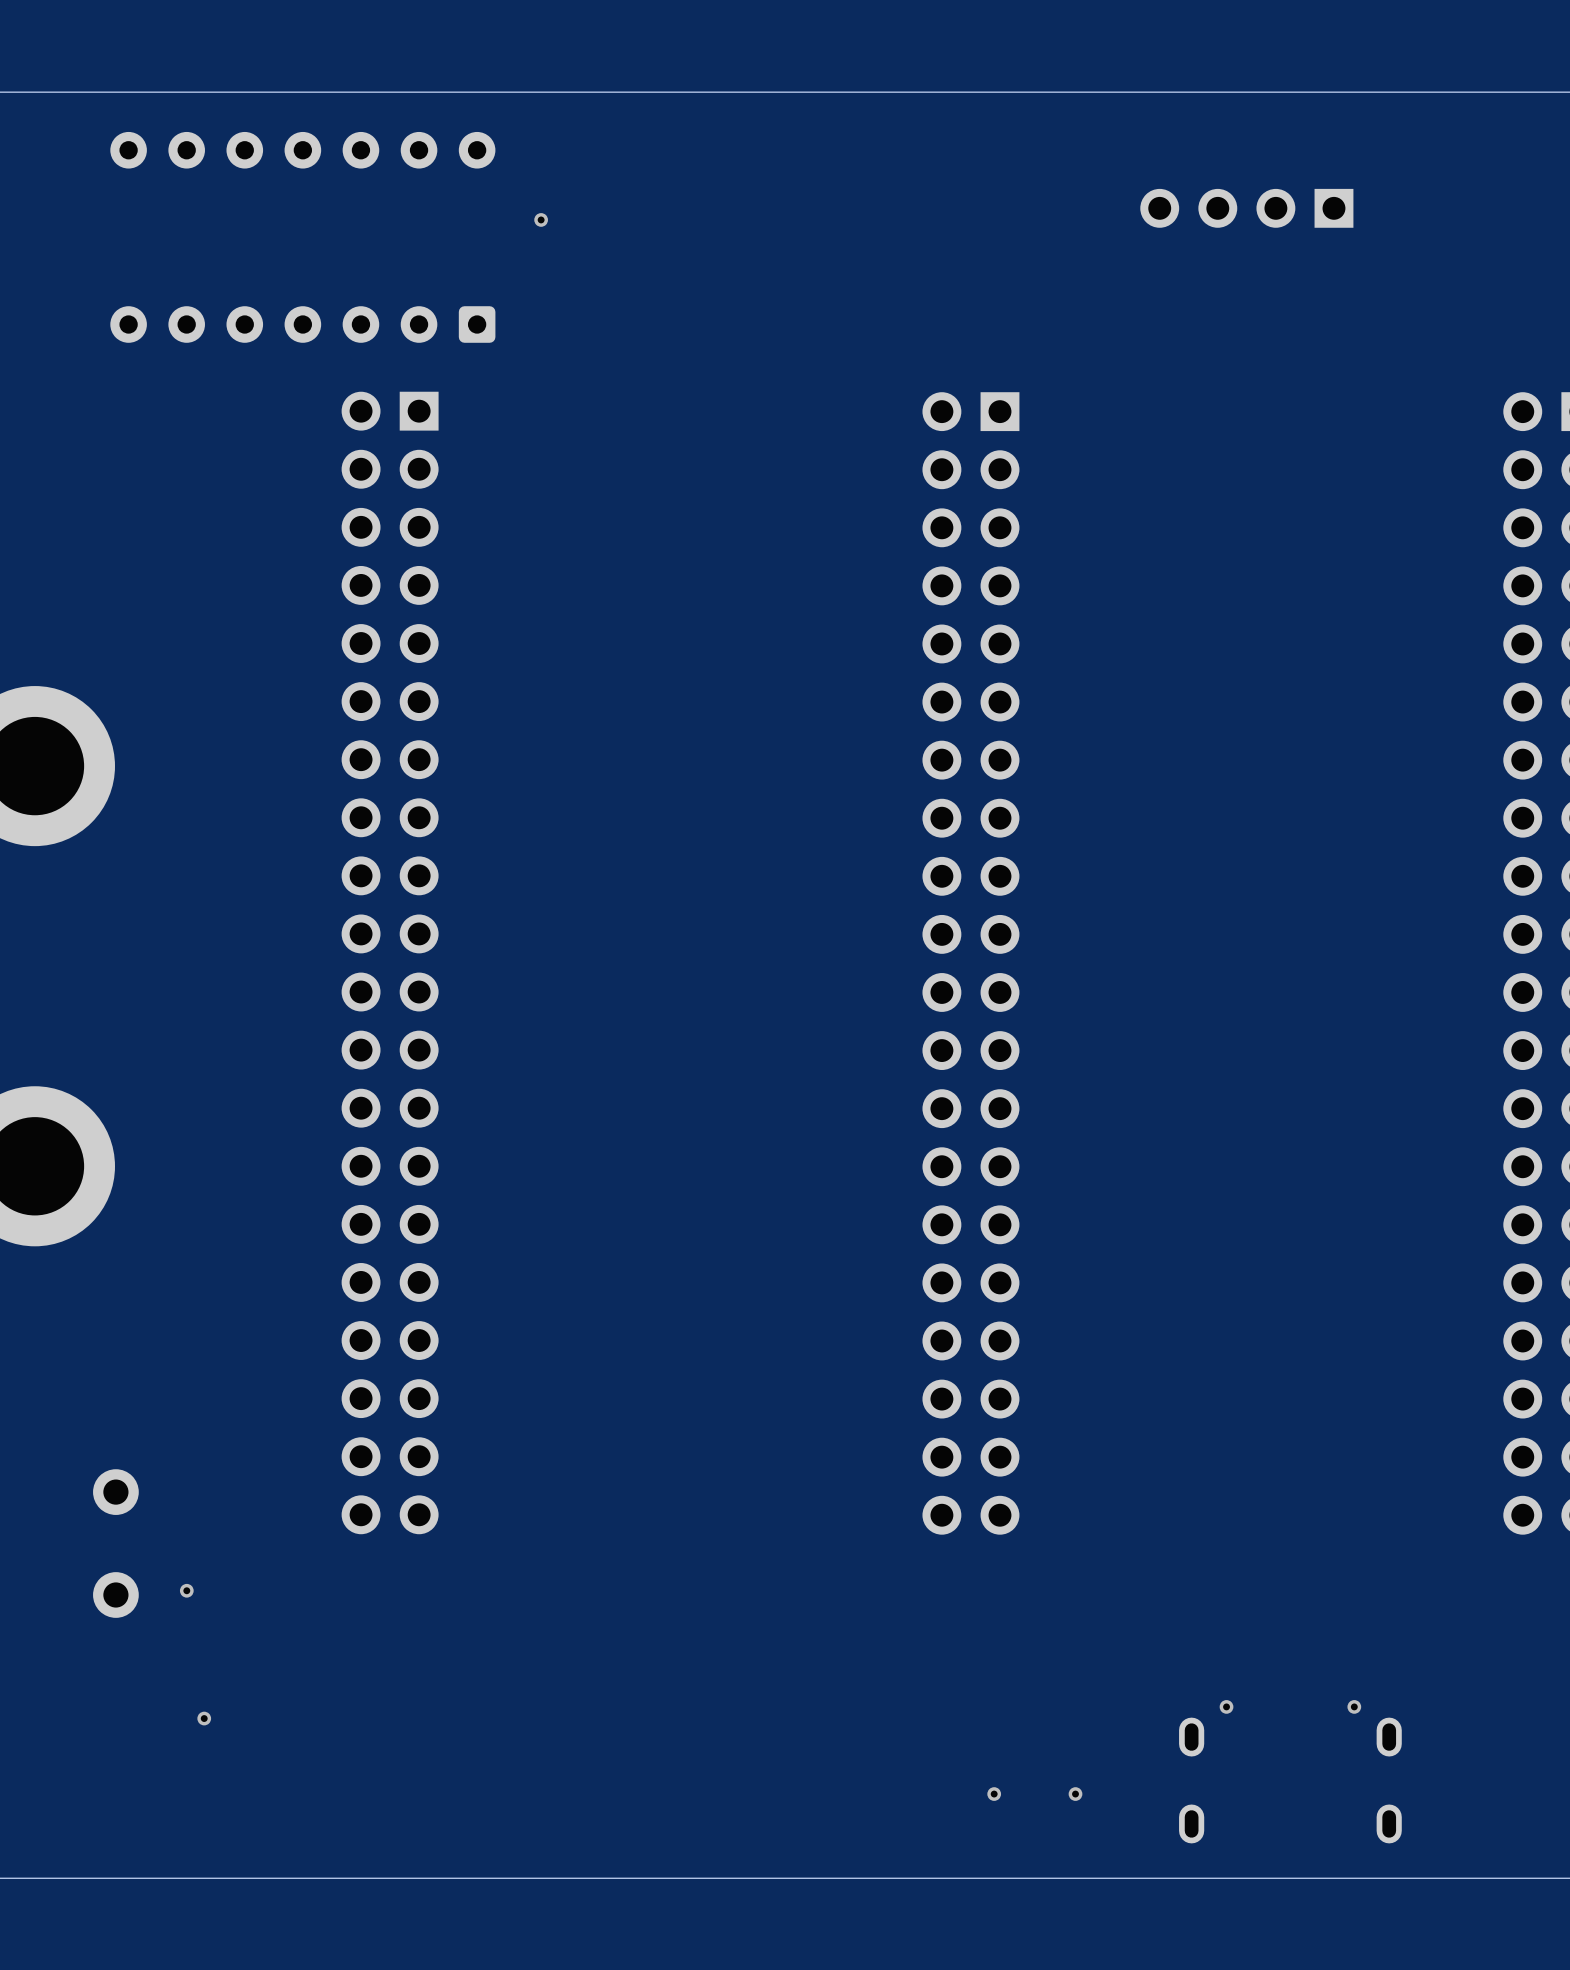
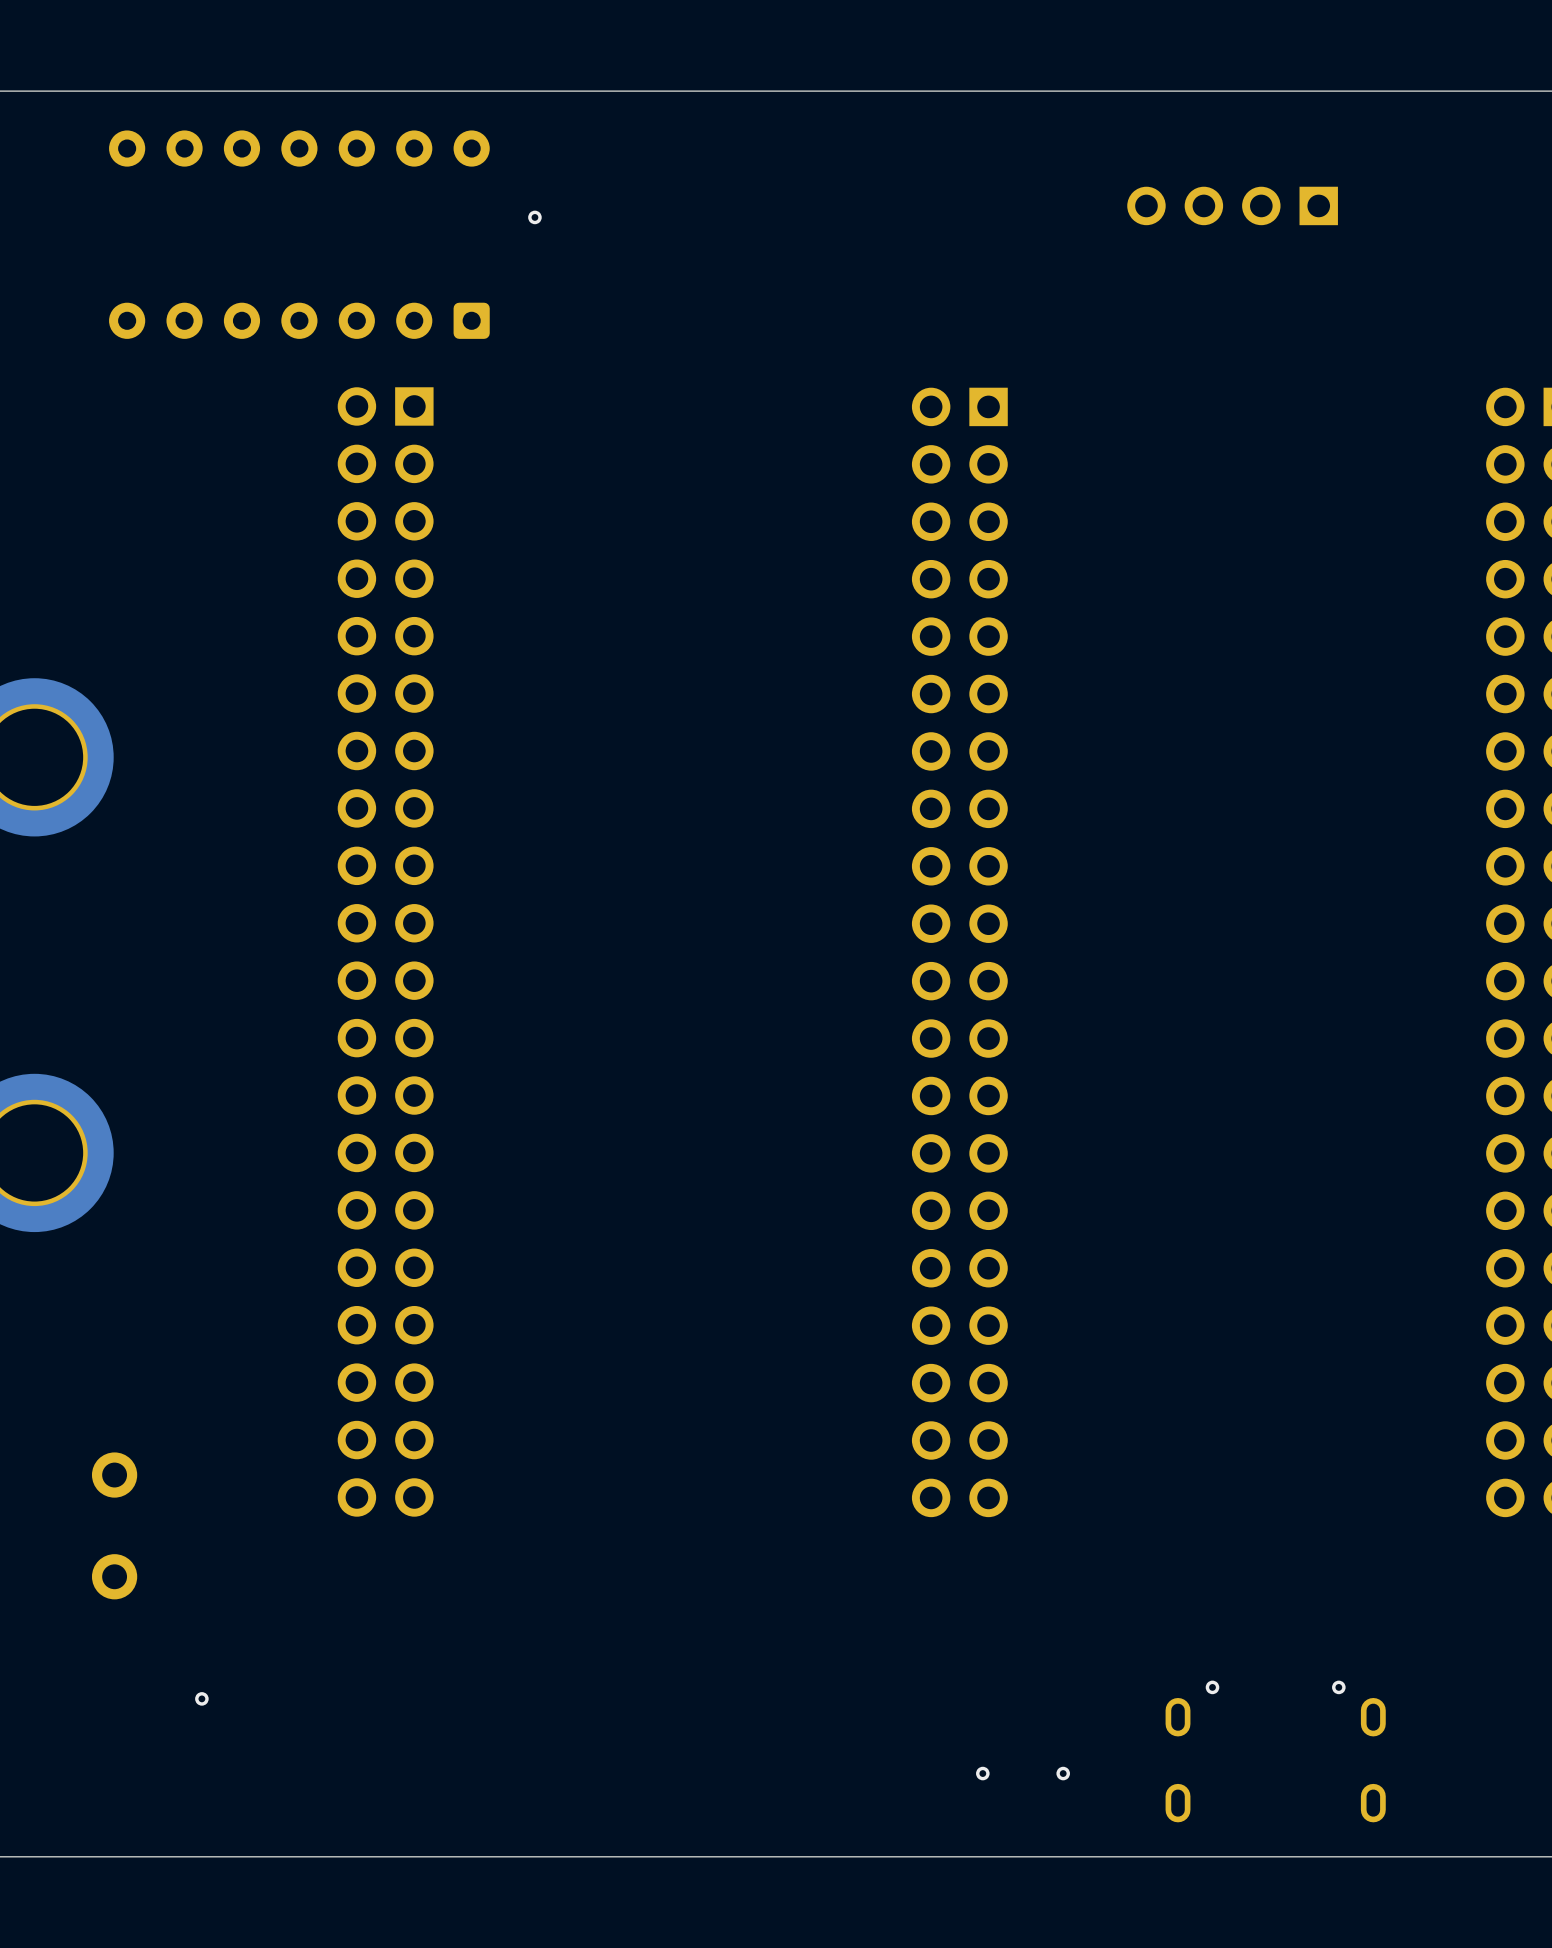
via: (186, 1590) -> none

